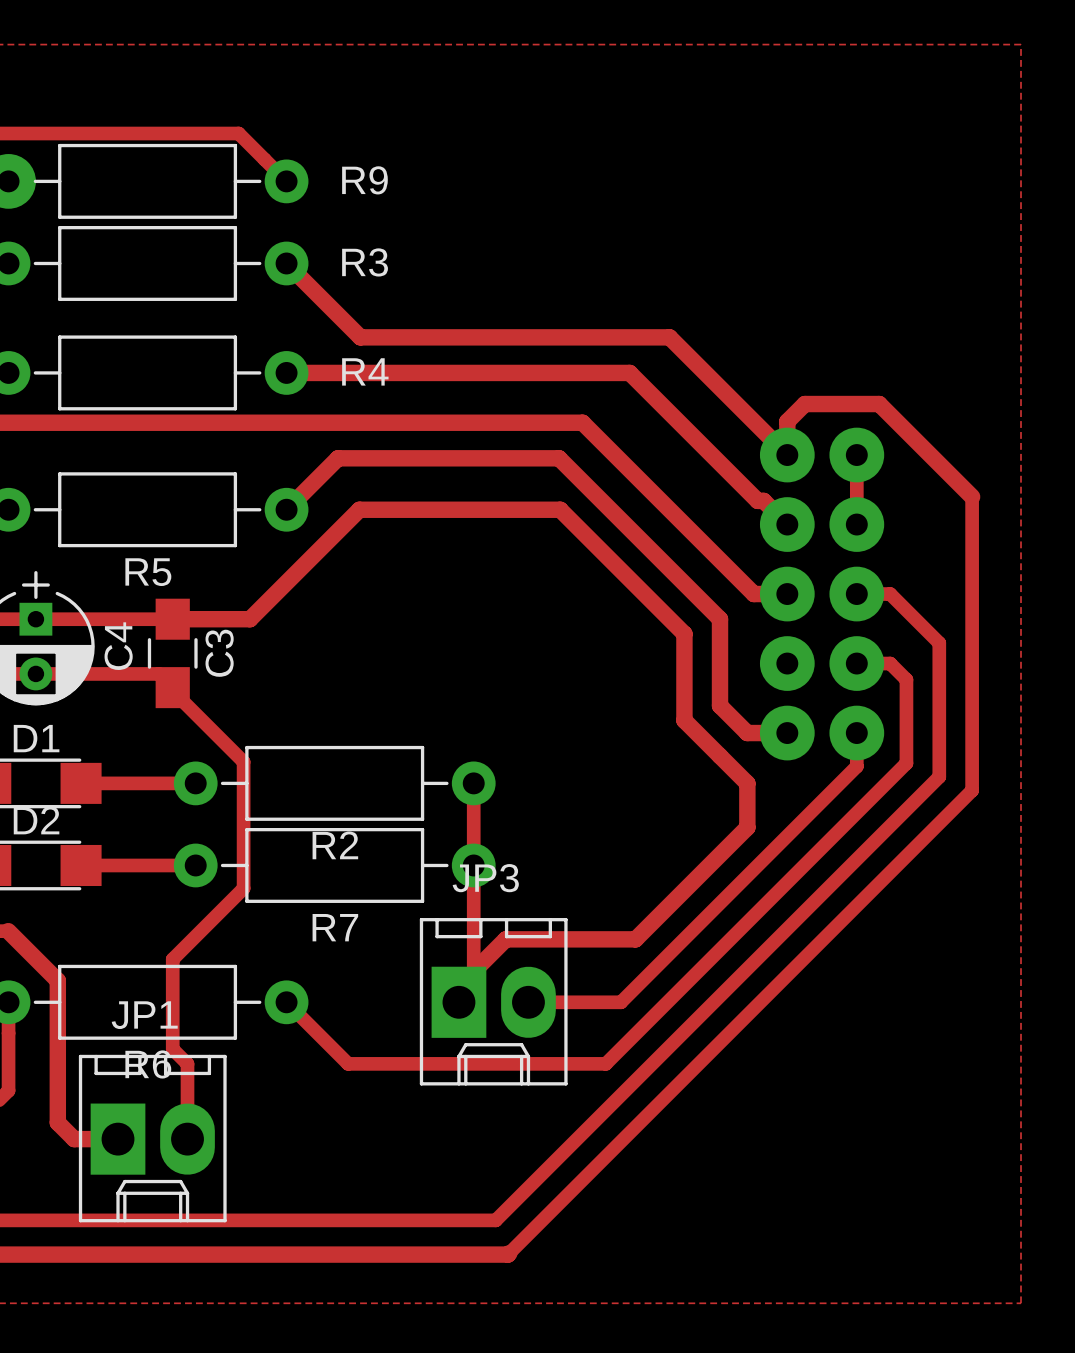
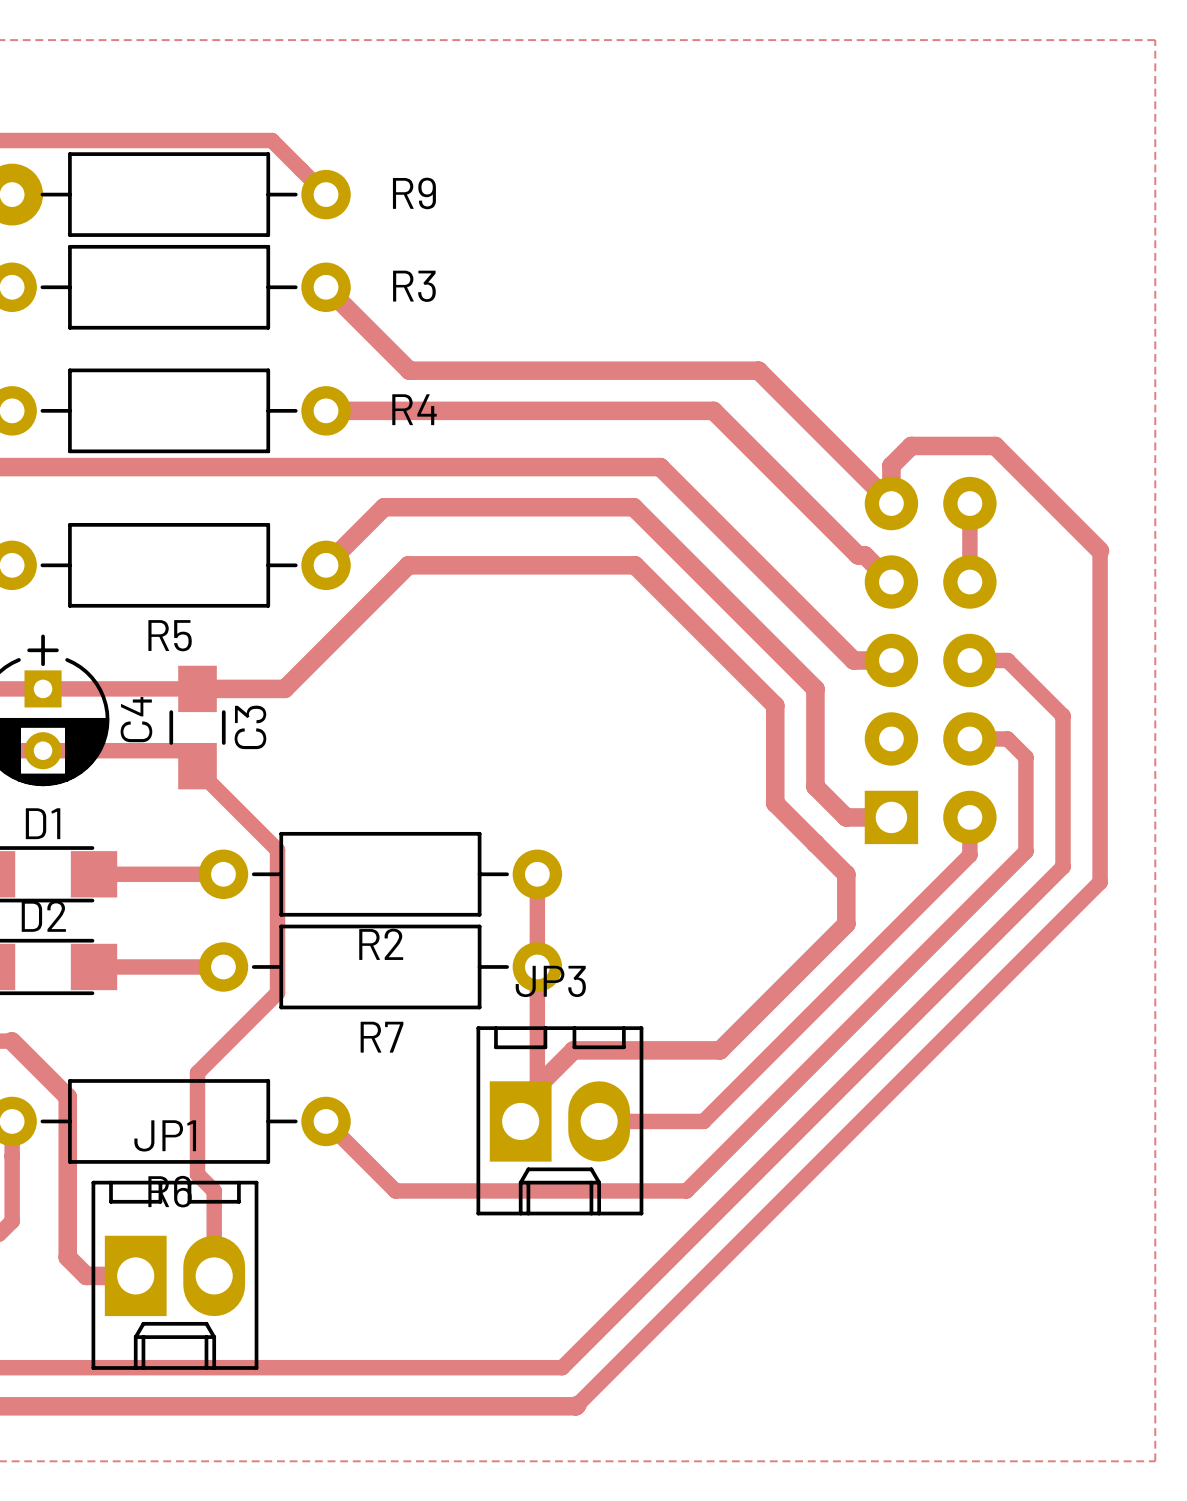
part footprint: [759, 427, 885, 761] -> [864, 476, 997, 845]

